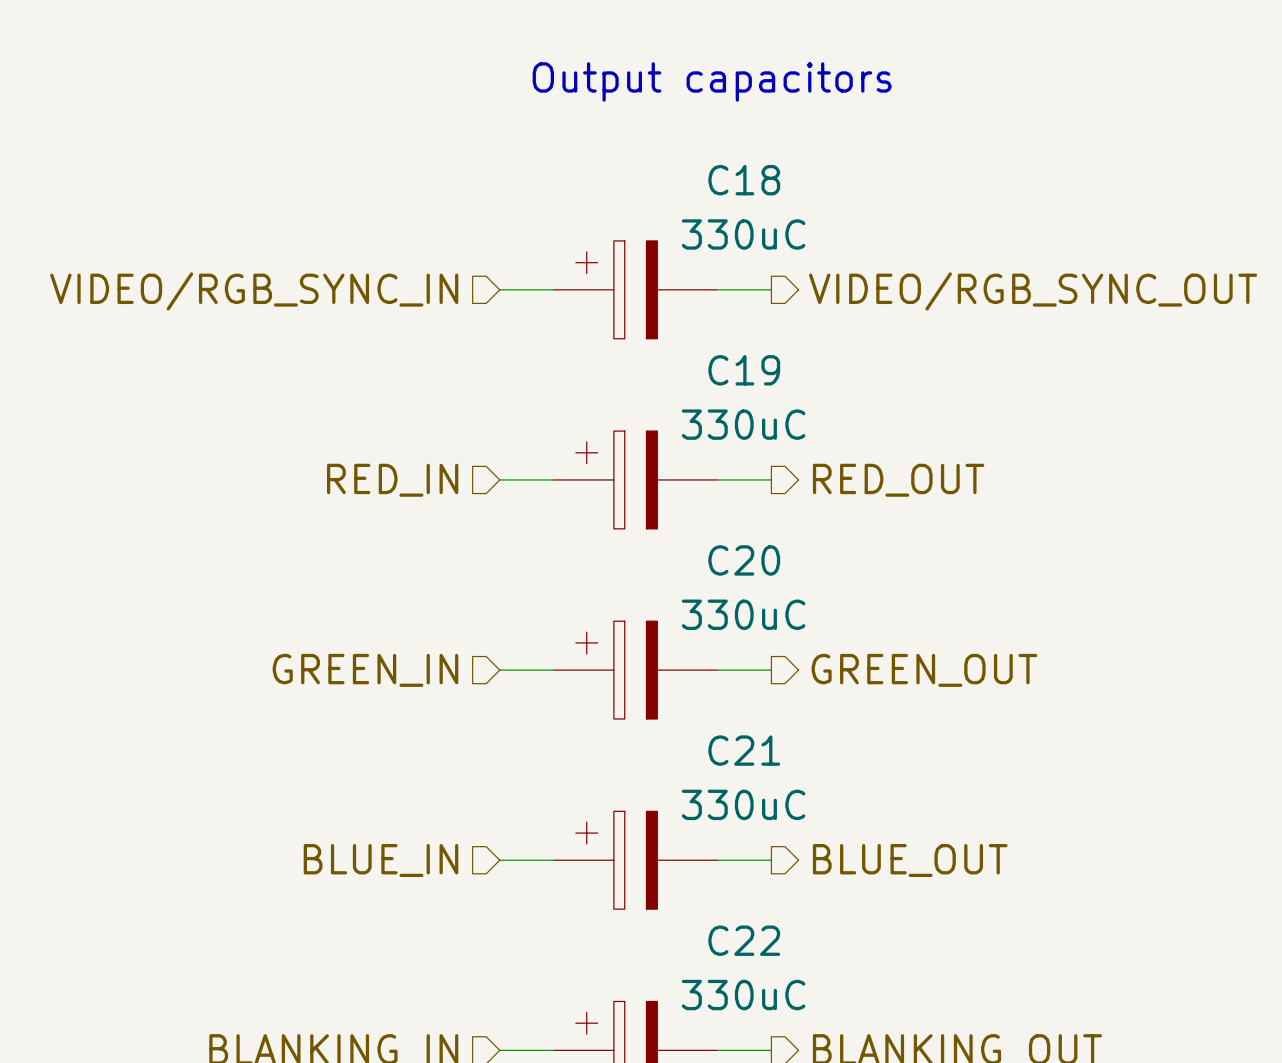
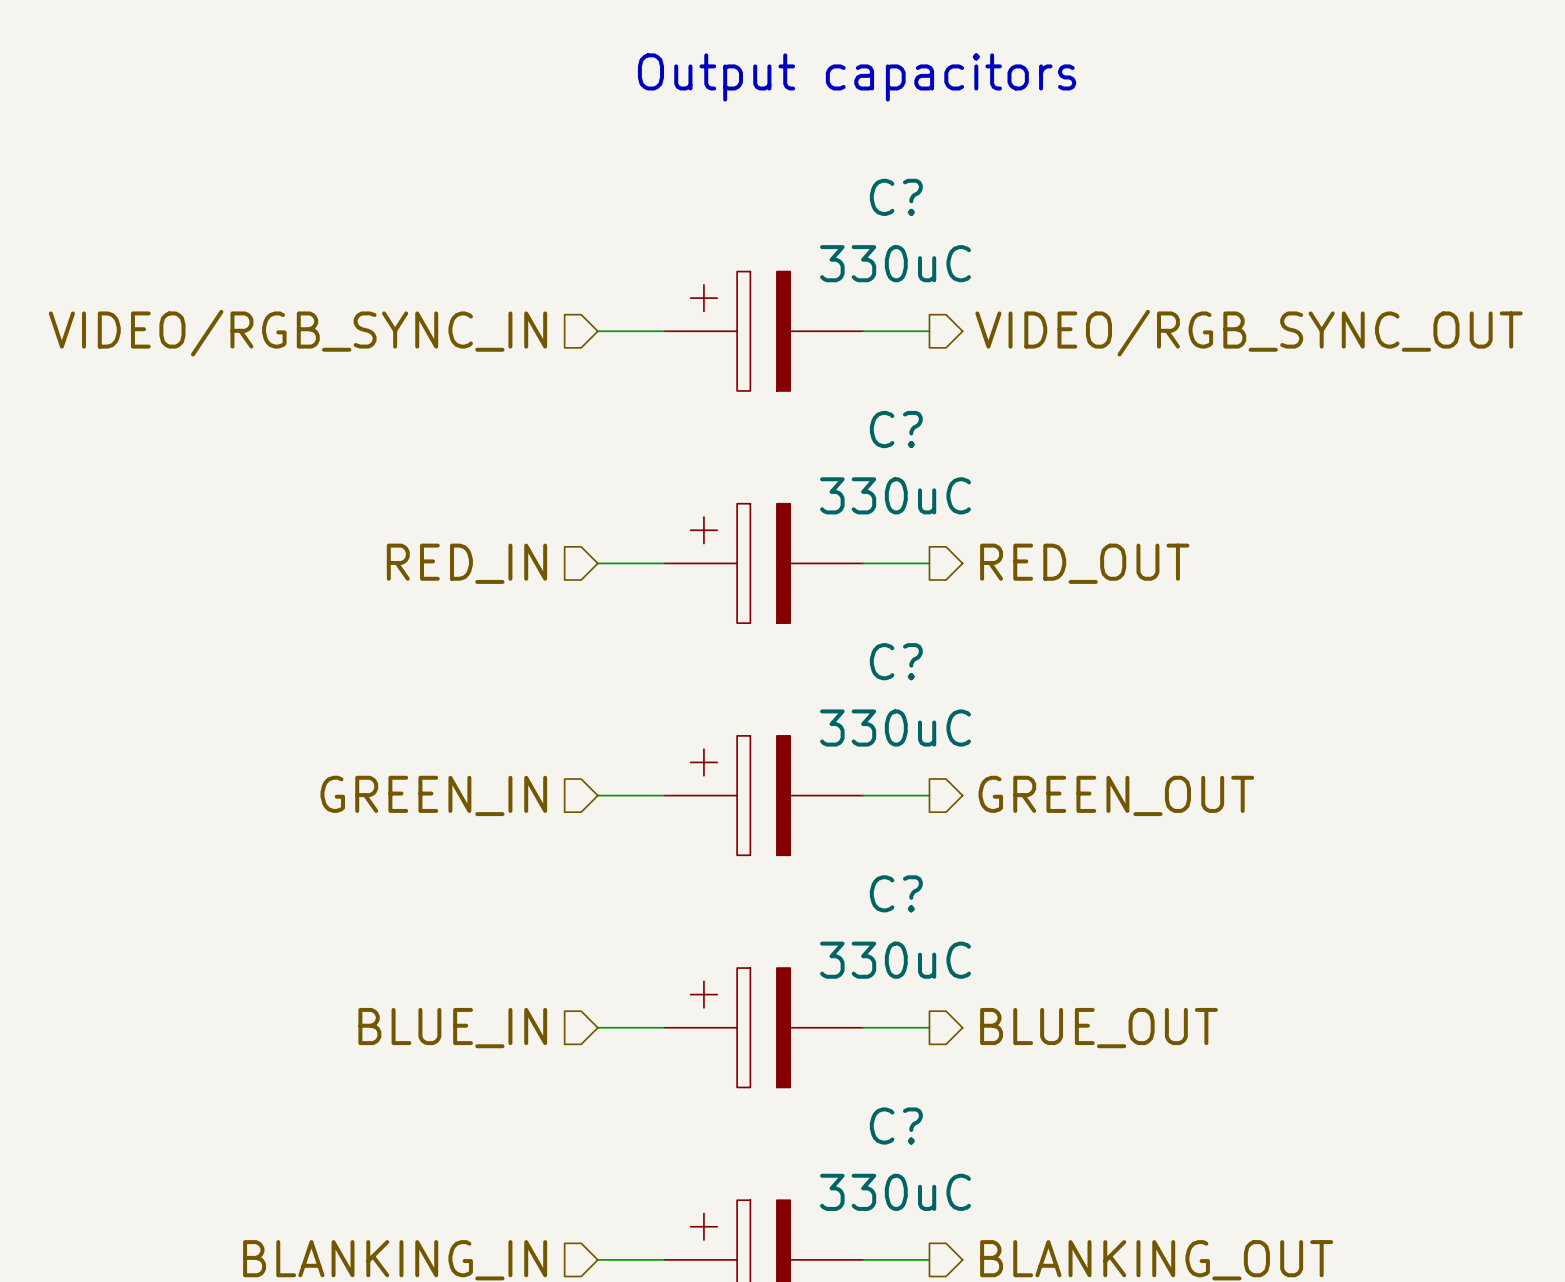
C18 name: C18 (744, 180) -> C? (896, 197)
C19 name: C19 (744, 370) -> C? (896, 429)
C20 name: C20 (744, 560) -> C? (896, 661)
C21 name: C21 (744, 750) -> C? (896, 893)
C22 name: C22 (744, 940) -> C? (896, 1126)

